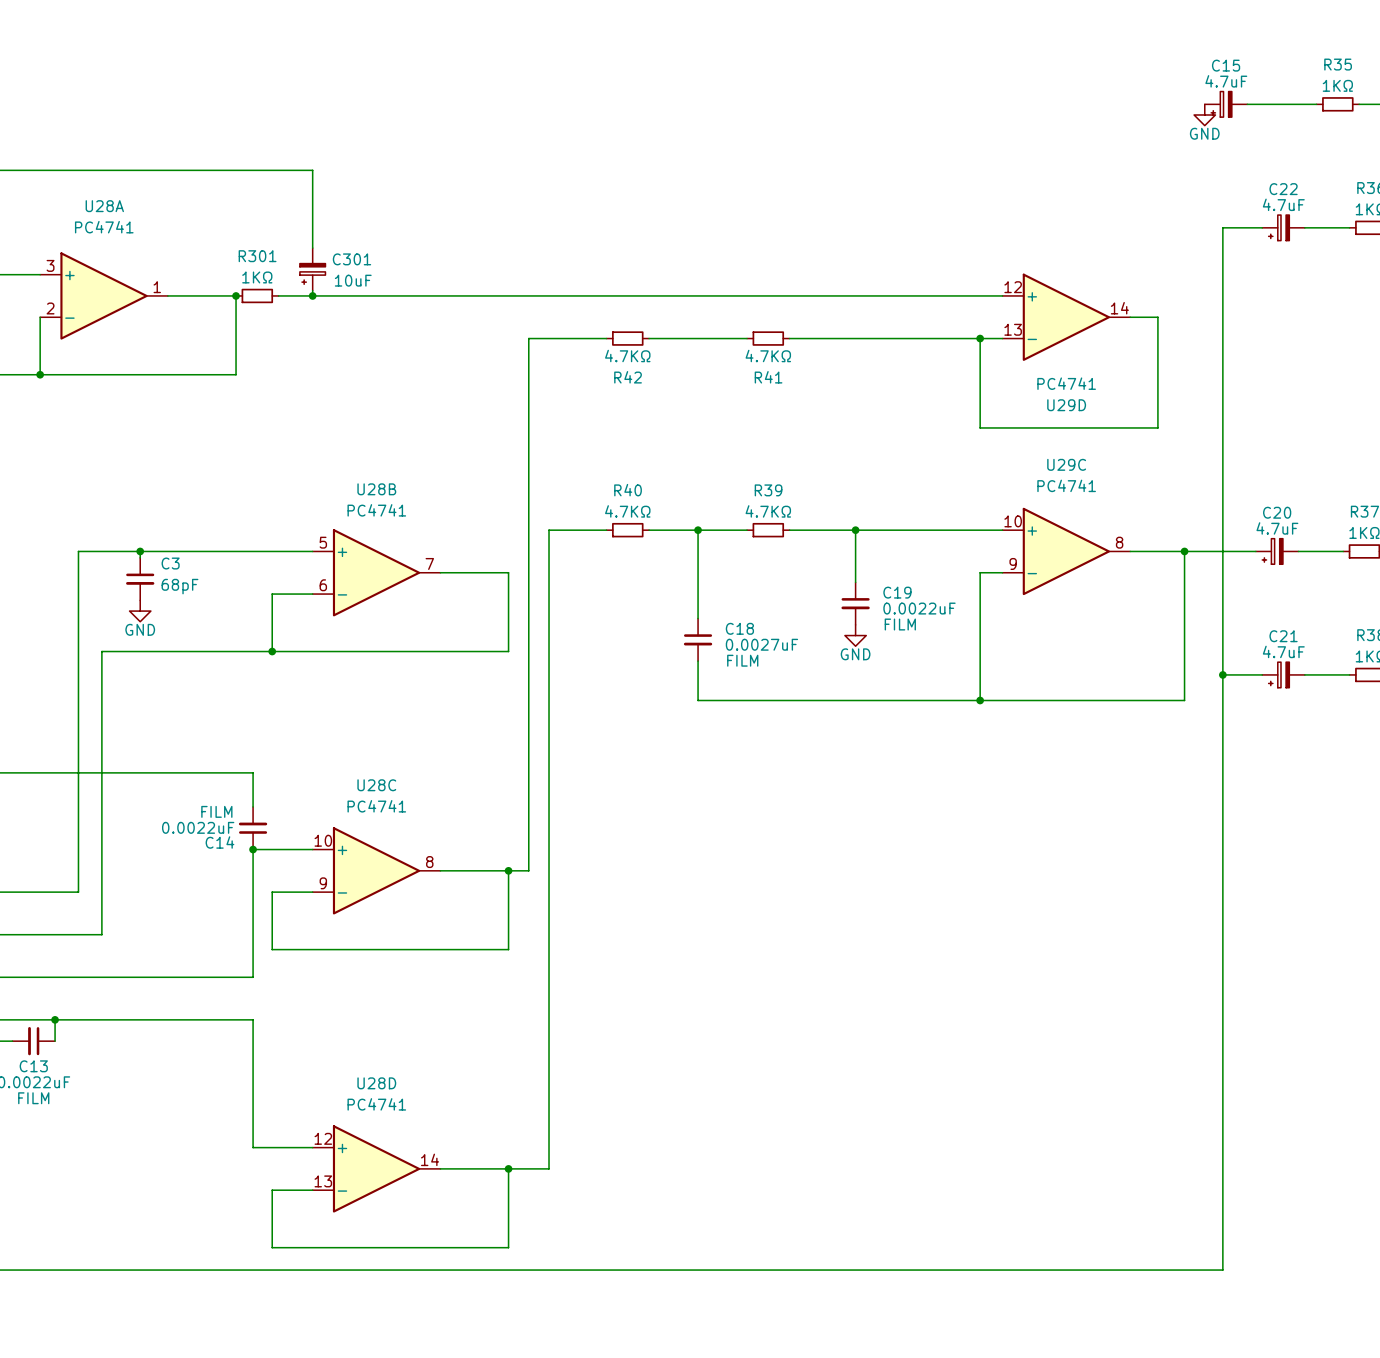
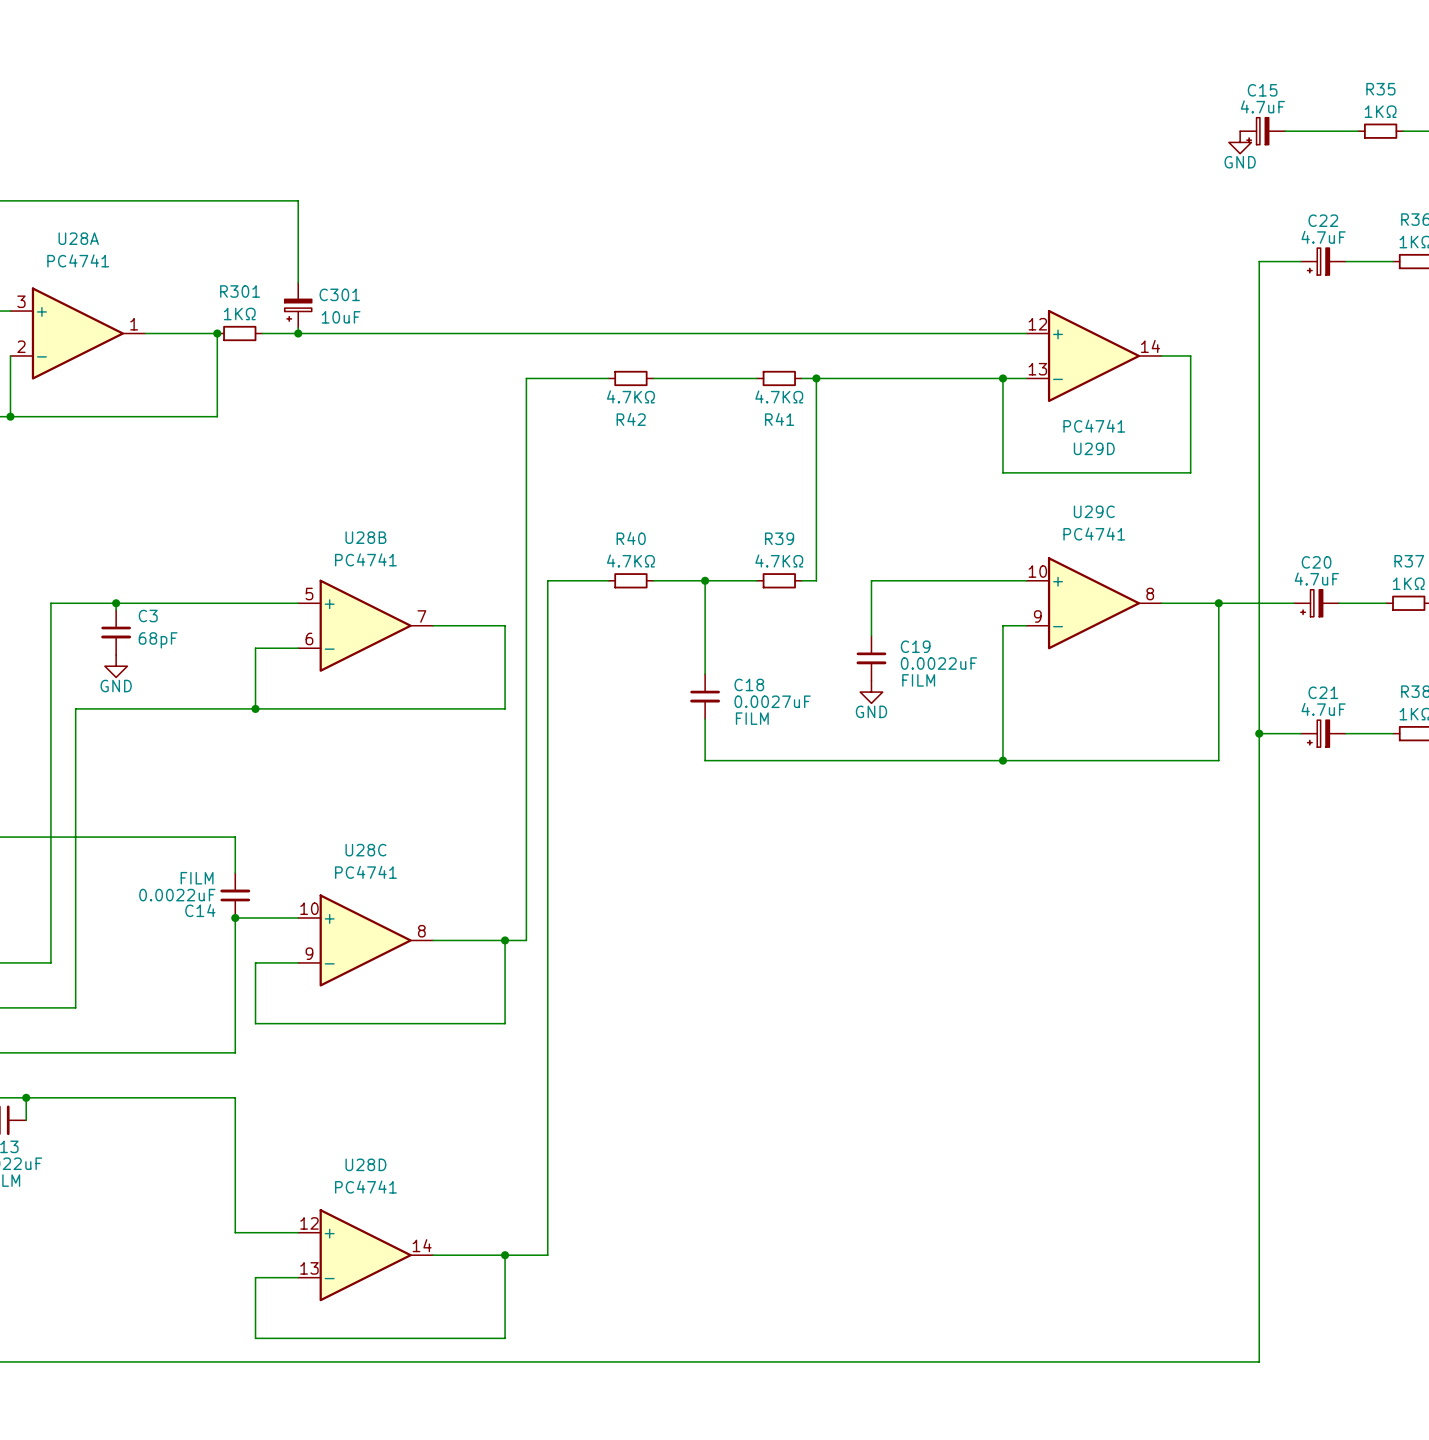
junction: none -> (816, 378)
wire: (803, 530) (855, 530) -> (816, 580) (816, 378)
junction: (855, 530) -> none

